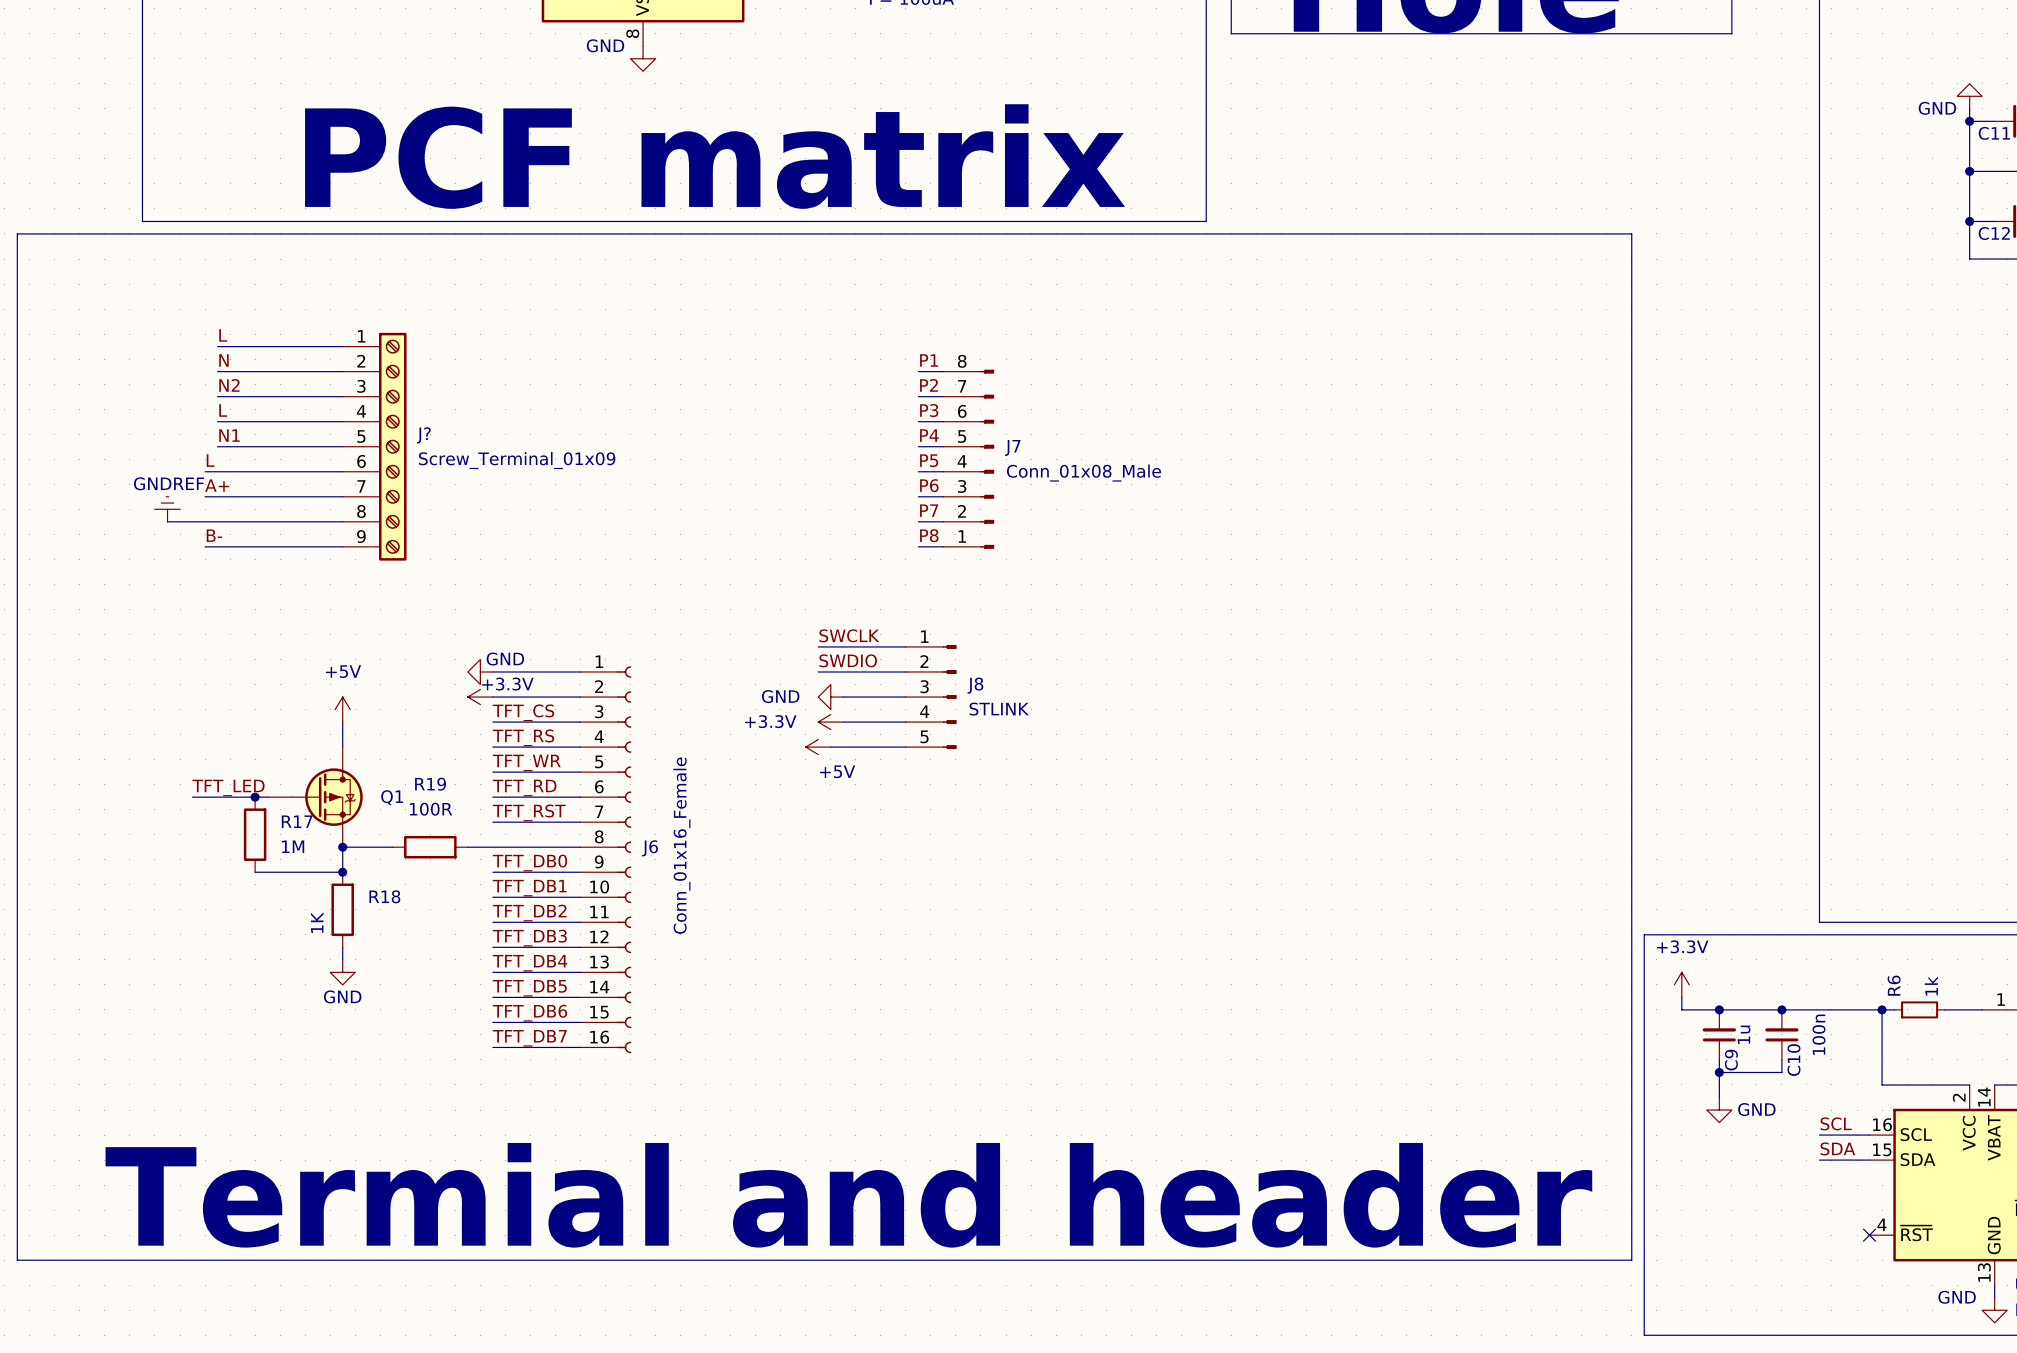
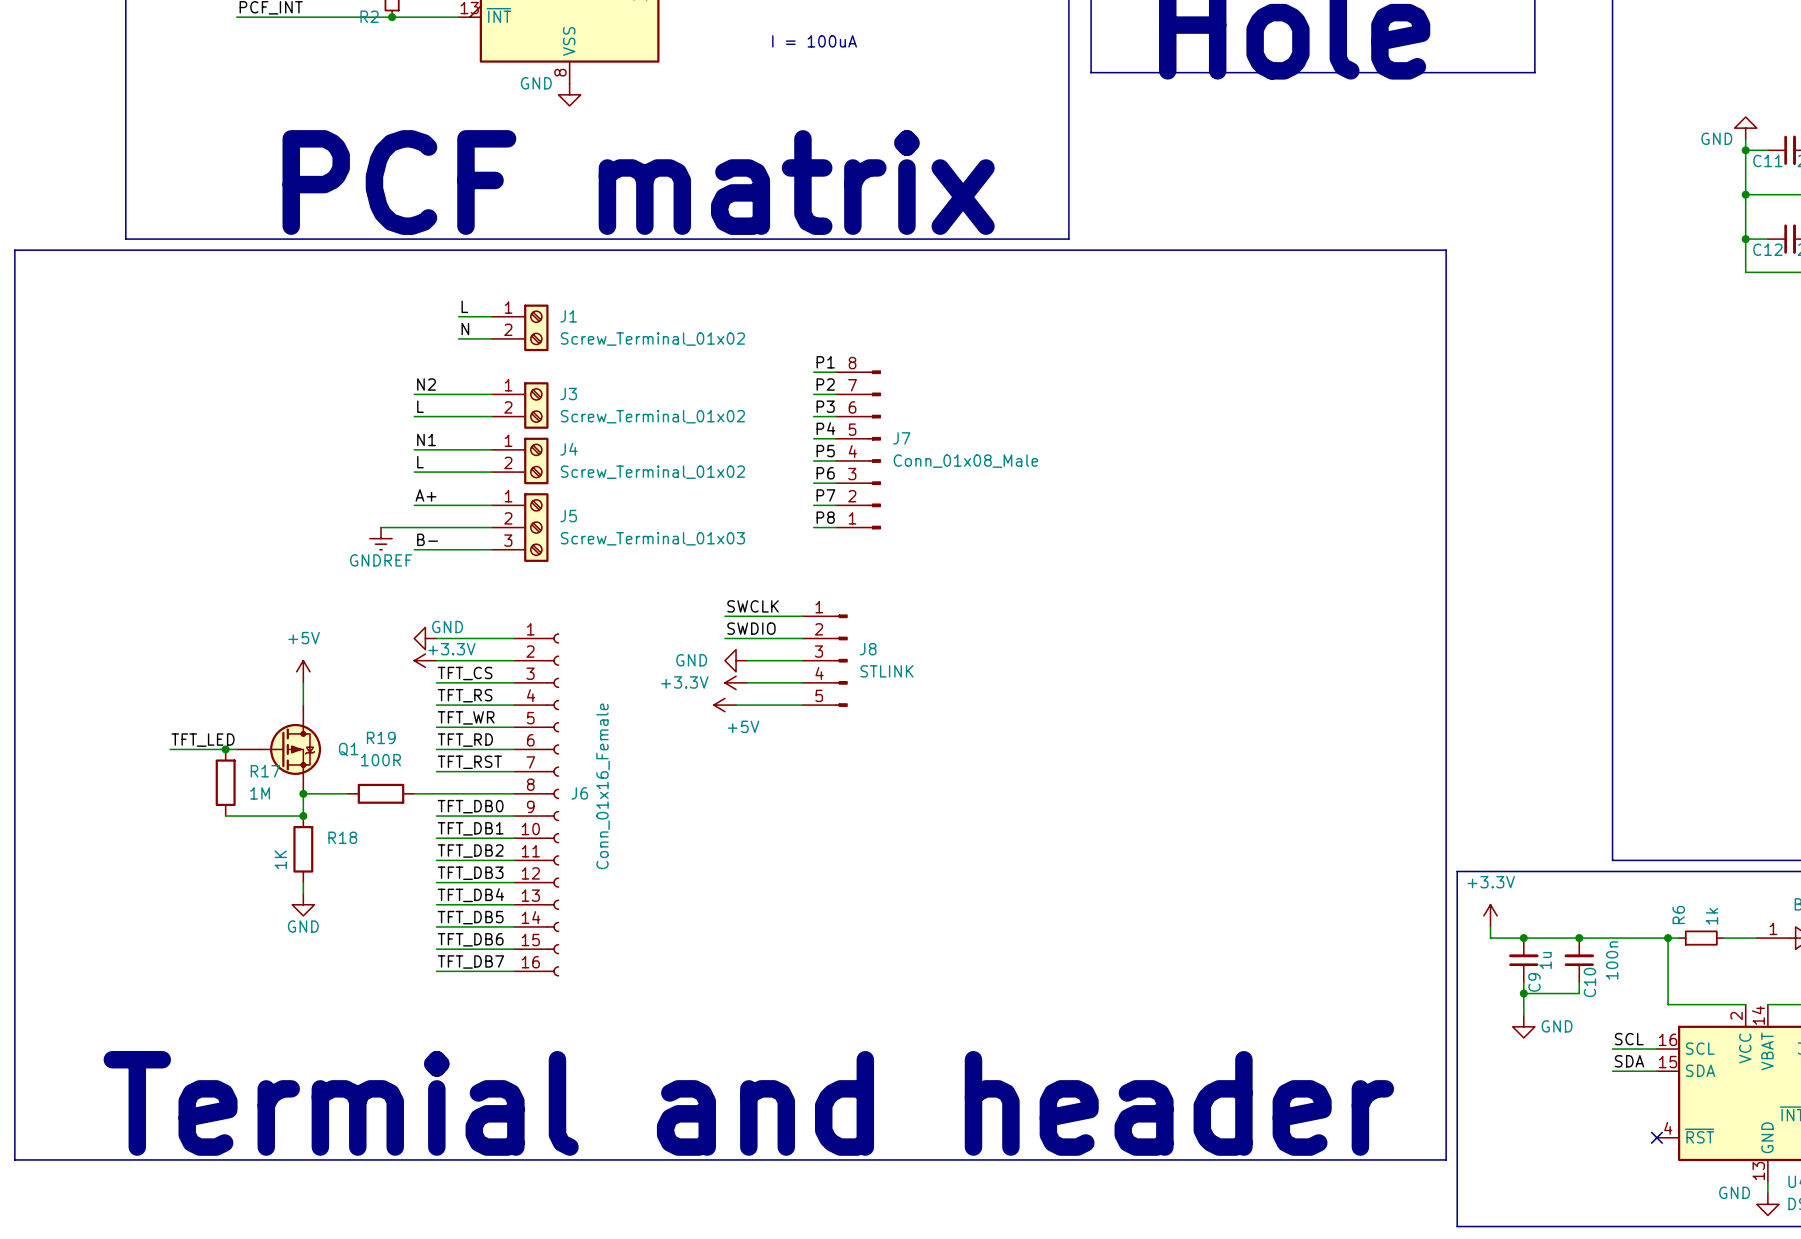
label: none -> L (464, 306)
wire: none -> (458, 316) (491, 316)
J1: none -> Screw_Terminal_01x02 (520, 327)
label: none -> N (465, 329)
wire: none -> (458, 338) (491, 338)
label: L (223, 335) -> none
wire: (217, 346) (342, 346) -> none
label: N (223, 360) -> none
wire: (217, 371) (342, 371) -> none
label: N2 (229, 385) -> none
label: none -> N2 (426, 384)
wire: (217, 396) (342, 396) -> none
wire: none -> (414, 394) (491, 394)
J3: none -> Screw_Terminal_01x02 (520, 405)
label: L (223, 410) -> none
label: none -> L (420, 406)
wire: (217, 421) (342, 421) -> none
wire: none -> (414, 416) (491, 416)
label: N1 (229, 435) -> none
wire: (217, 446) (342, 446) -> (381, 527) (491, 527)
J?: Screw_Terminal_01x09 (374, 446) -> none
label: none -> N1 (426, 439)
wire: none -> (414, 449) (491, 449)
label: L (210, 460) -> none
wire: (205, 471) (342, 471) -> none
J4: none -> Screw_Terminal_01x02 (520, 460)
label: none -> L (420, 462)
wire: none -> (414, 472) (491, 472)
label: A+ (217, 485) -> none
wire: (205, 496) (342, 496) -> none
power symbol: GNDREF (167, 509) -> none
label: none -> A+ (425, 495)
wire: (167, 521) (342, 521) -> none
wire: none -> (414, 505) (491, 505)
label: B- (214, 535) -> none
wire: (205, 546) (342, 546) -> none
J5: none -> Screw_Terminal_01x03 (520, 527)
power symbol: none -> GNDREF (381, 538)
label: none -> B- (427, 539)
wire: none -> (414, 549) (491, 549)

